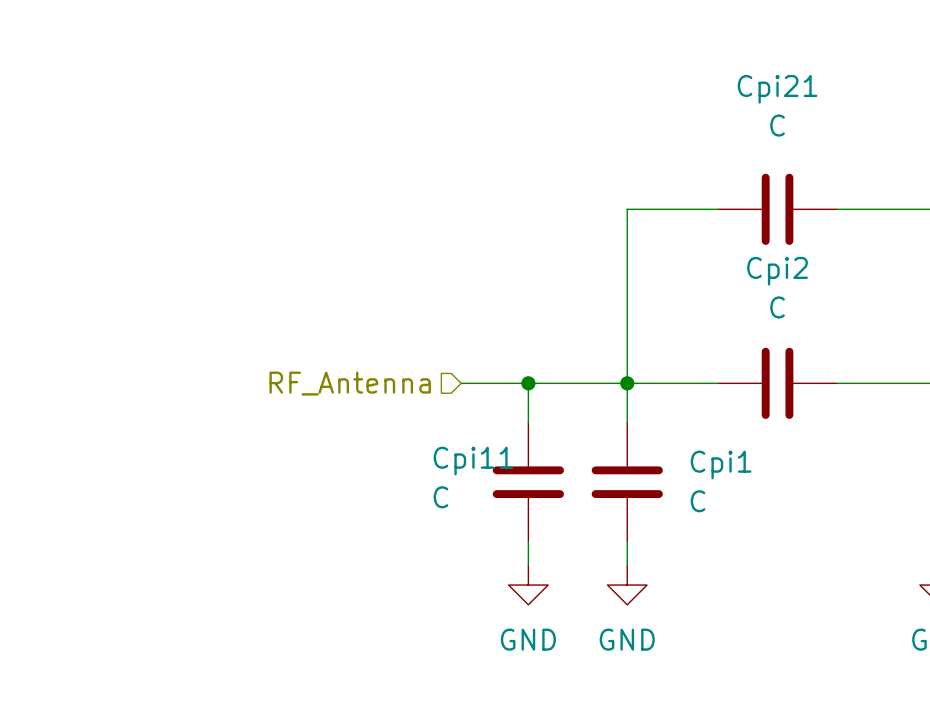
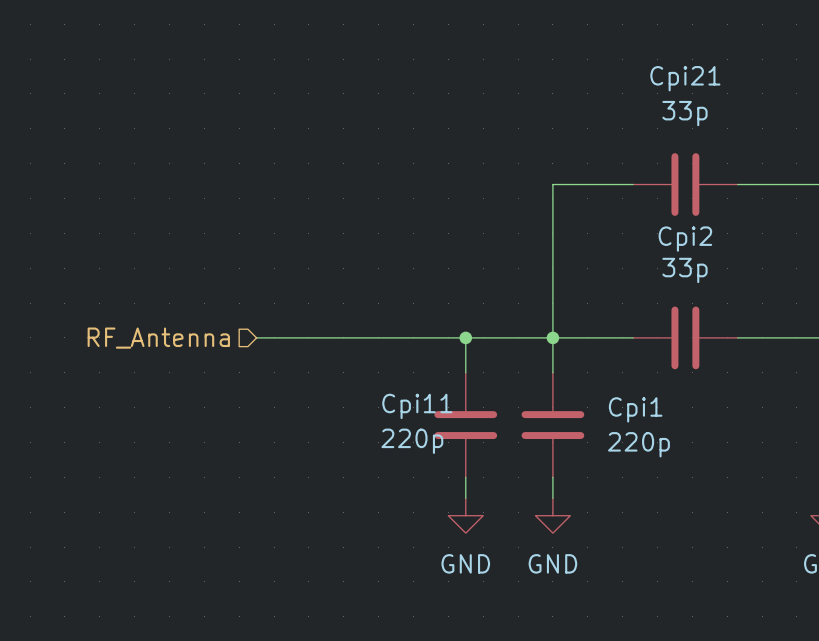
Cpi21 value: C (777, 125) -> 33p (684, 113)
Cpi2 value: C (777, 307) -> 33p (684, 270)
wire: none -> (256, 337) (406, 337)
hierarchical label position: RF_Antenna (350, 383) -> RF_Antenna (158, 338)
Cpi11 value: C (440, 497) -> 220p (412, 441)
Cpi1 value: C (698, 501) -> 220p (638, 444)

